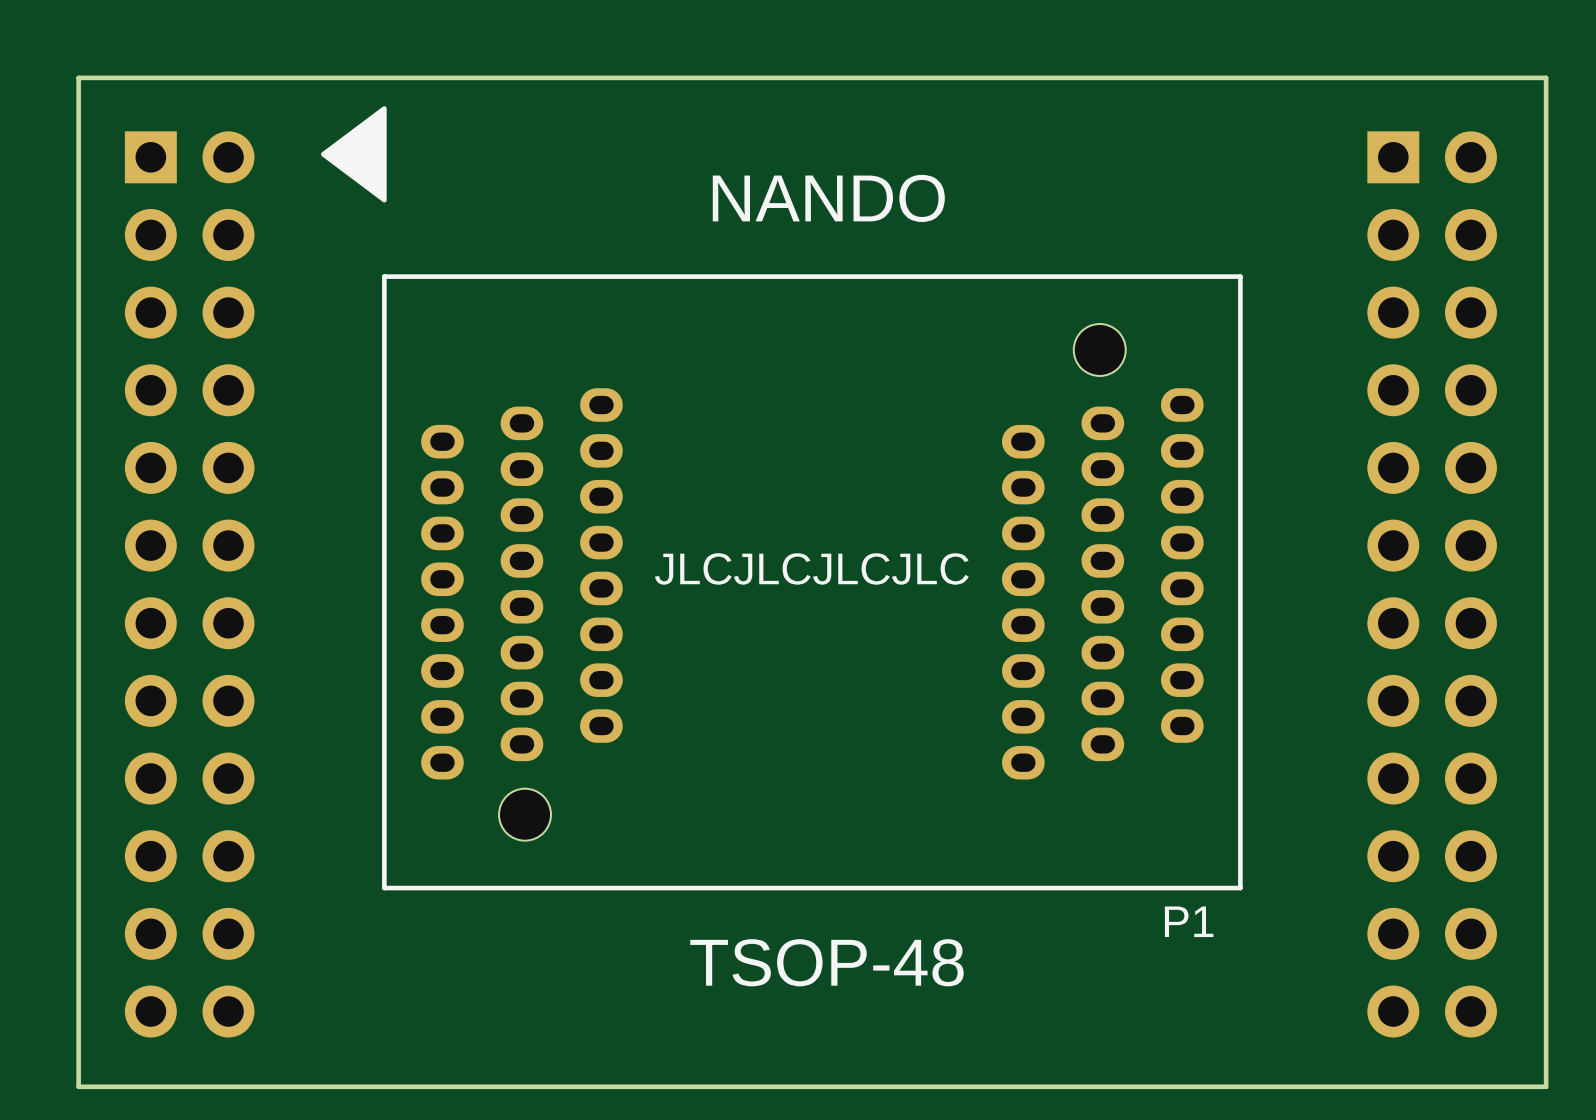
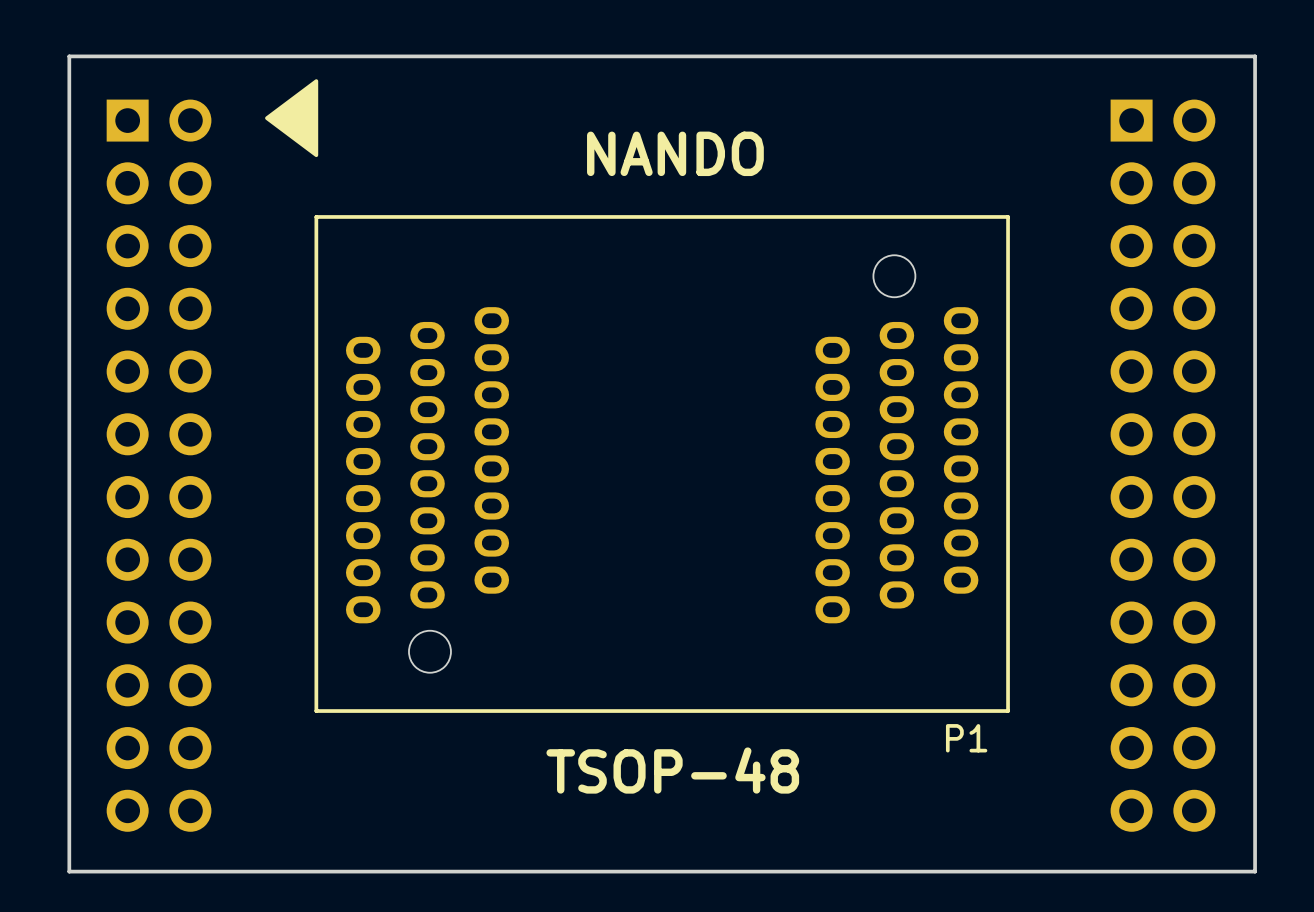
text: JLCJLCJLCJLC (811, 568) -> none

